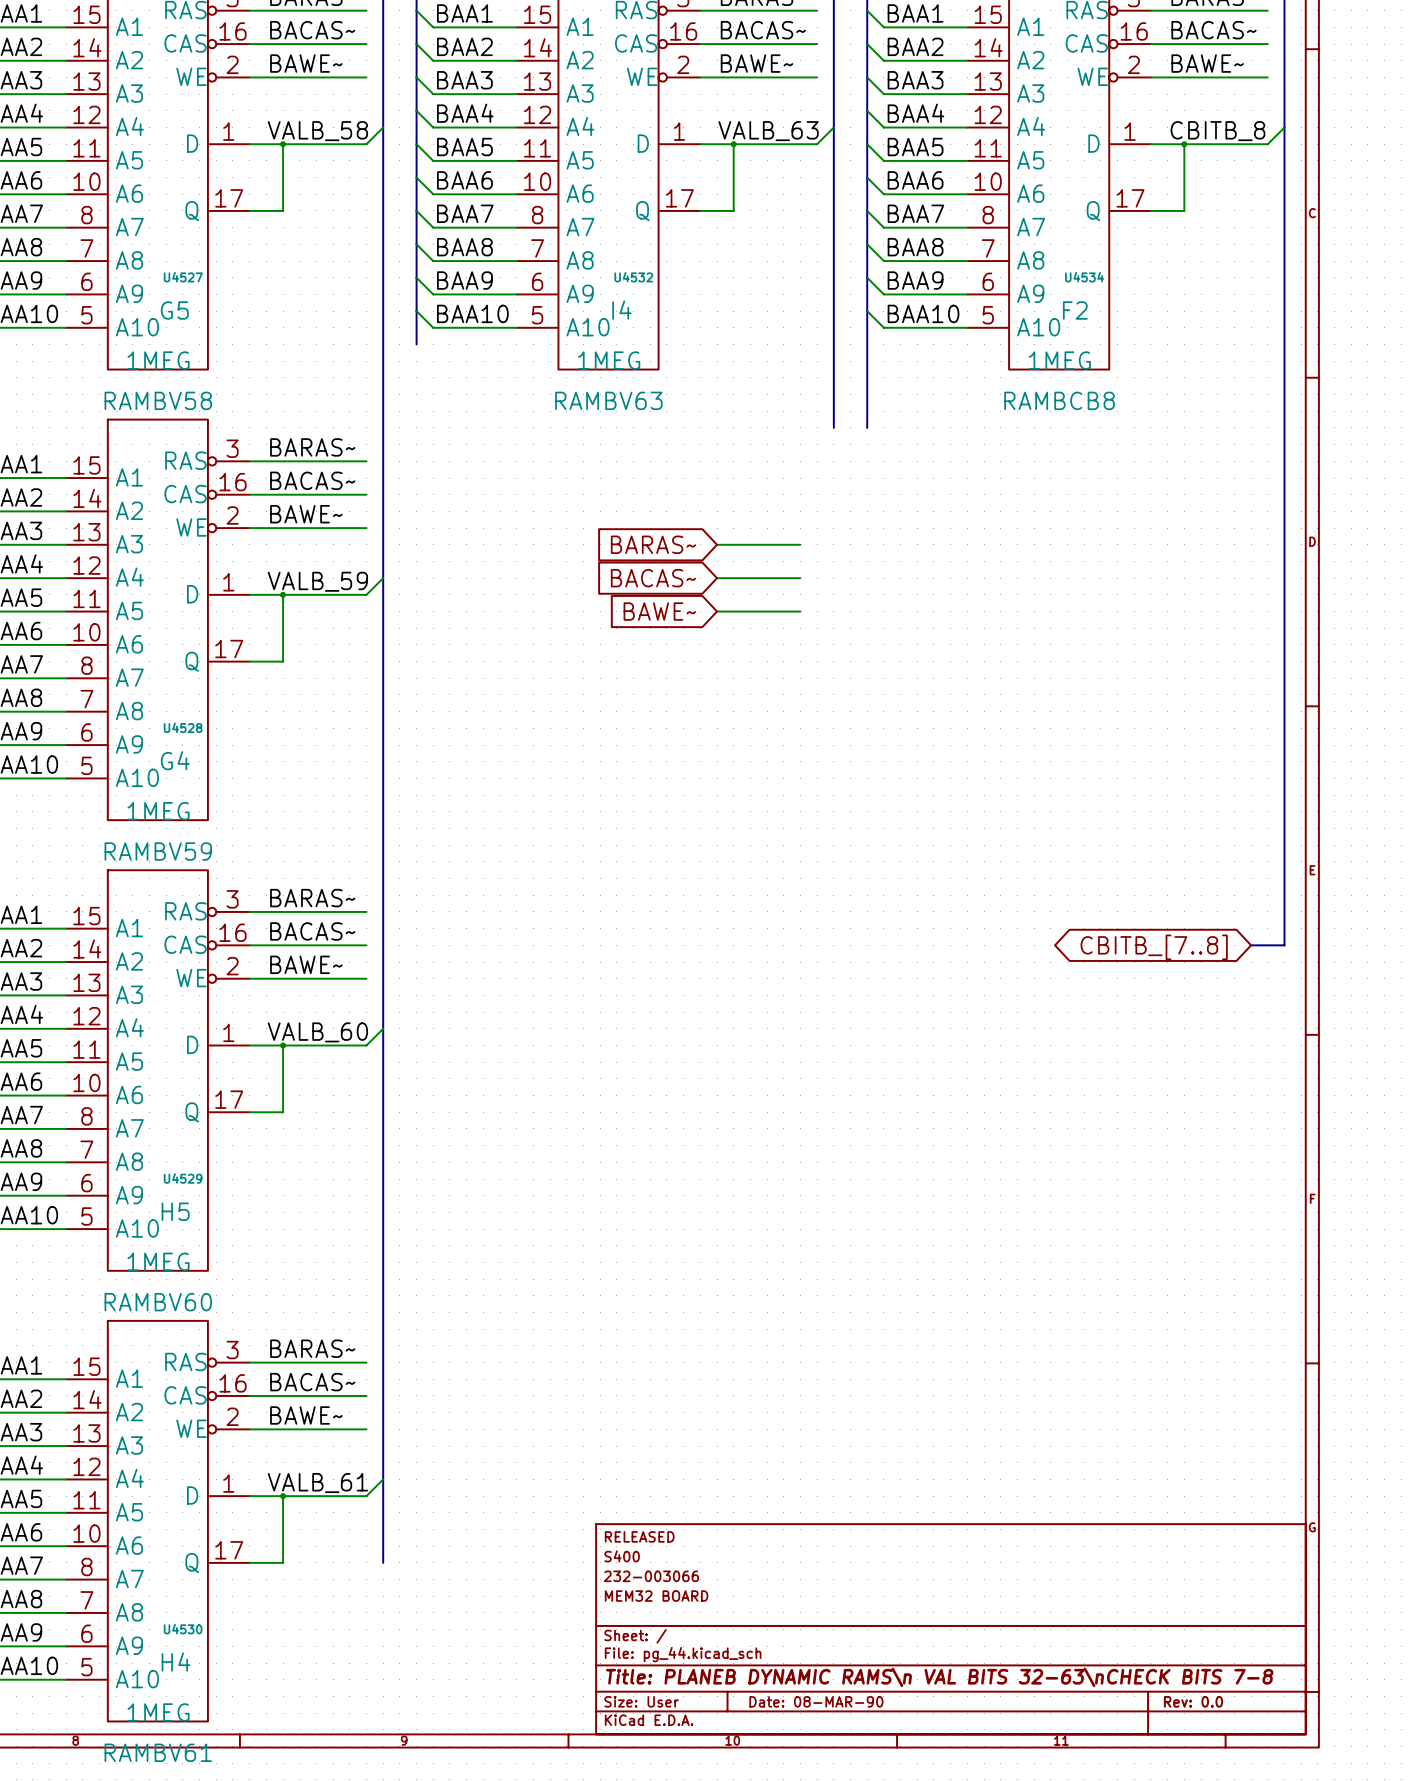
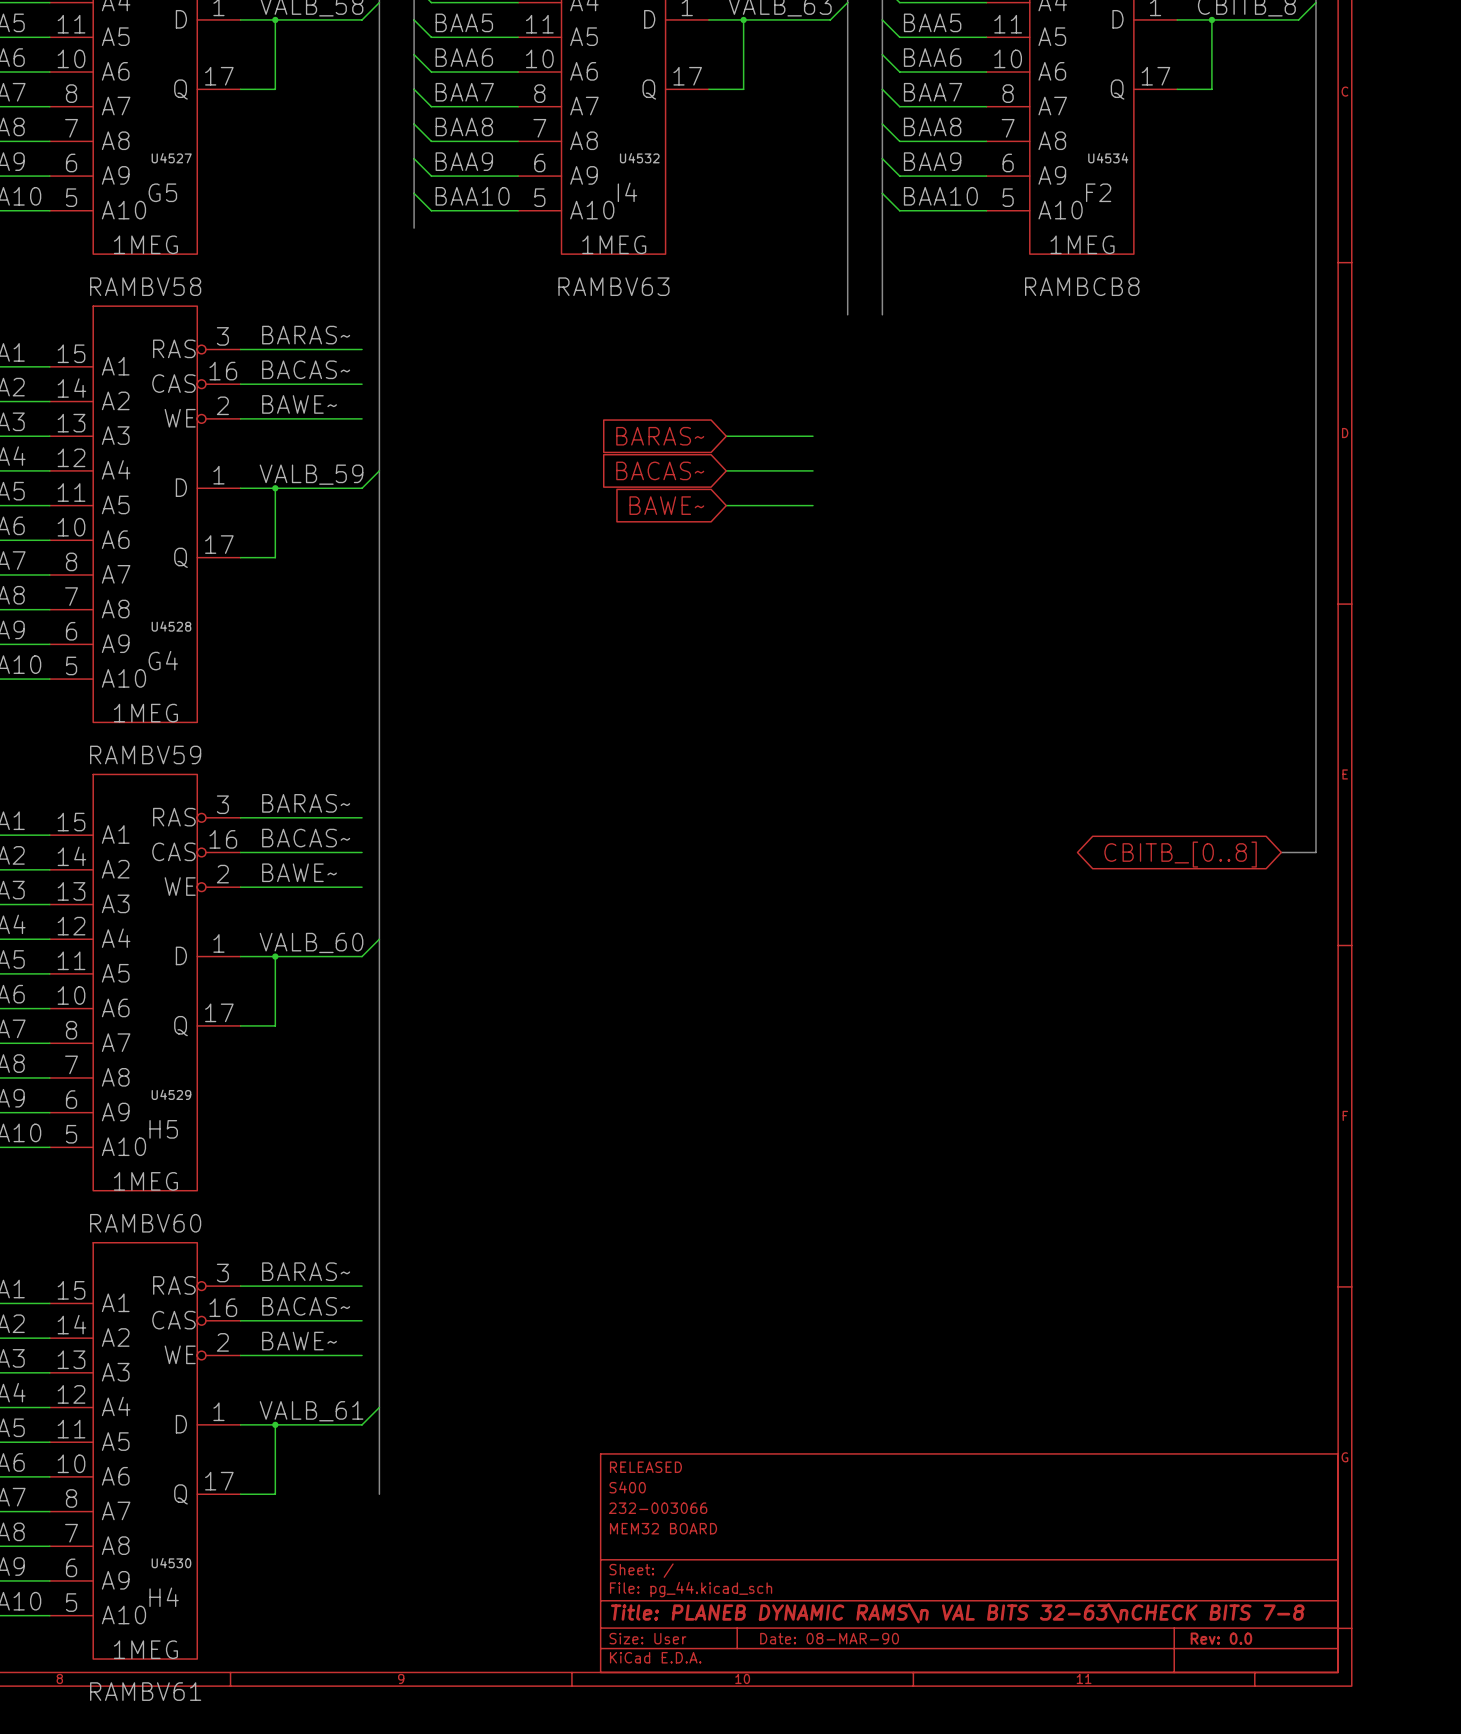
global label: CBITB_[7..8] (1154, 947) -> CBITB_[0..8] (1180, 854)

